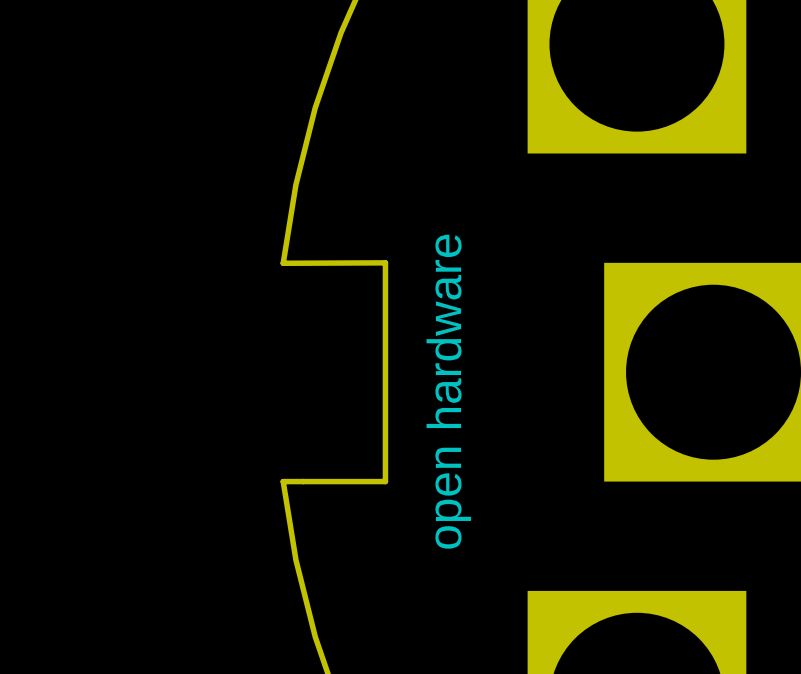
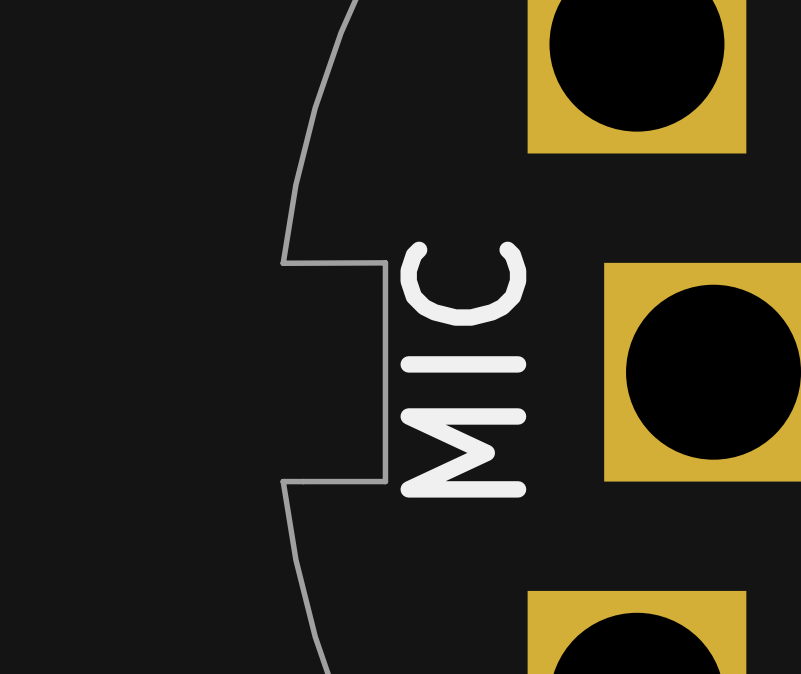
part value: none -> MIC (463, 369)
text: open hardware (448, 391) -> none

